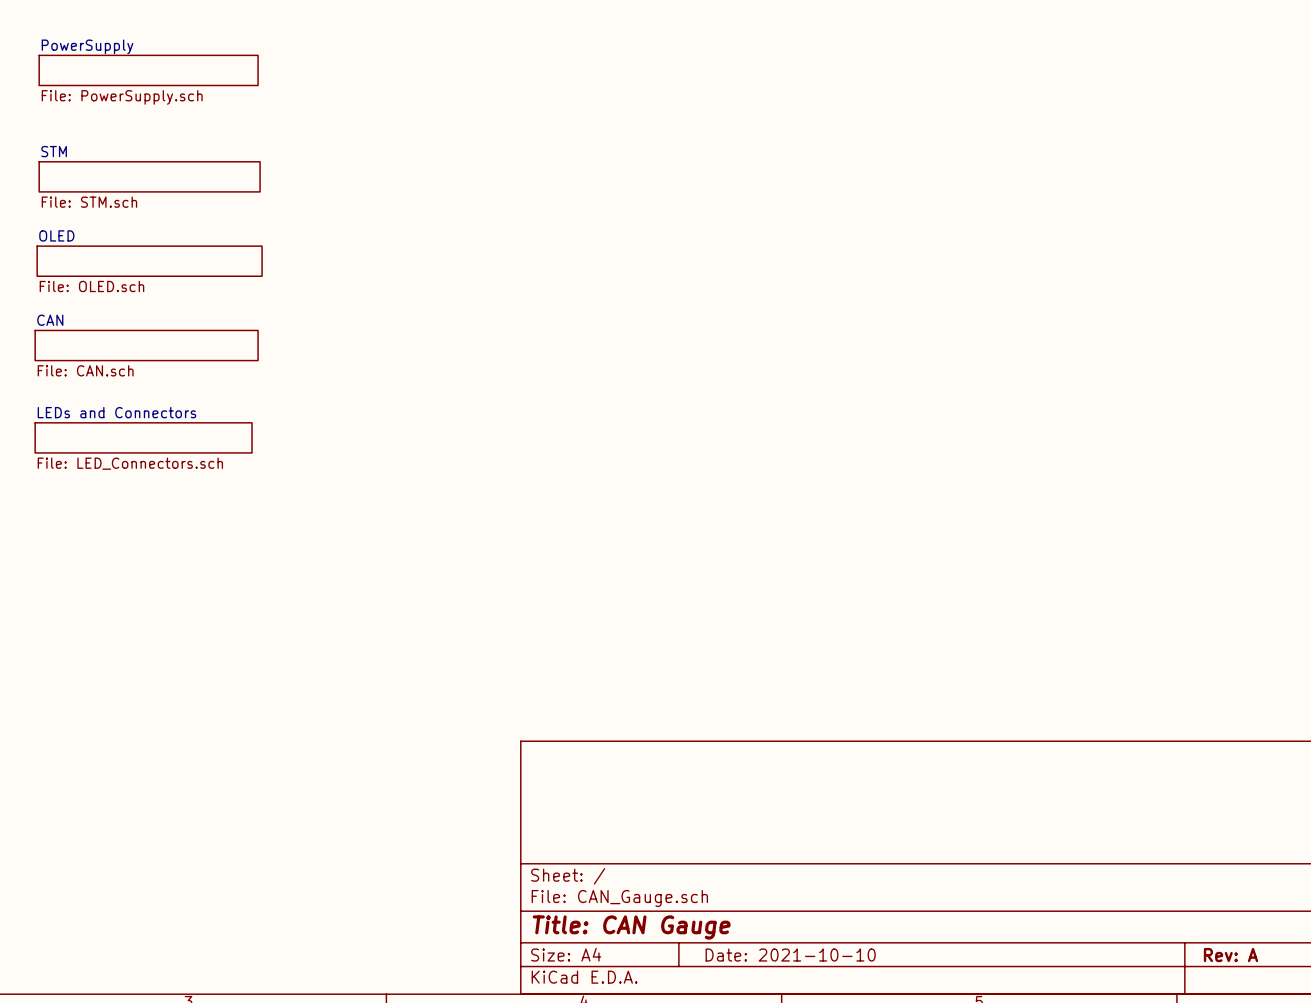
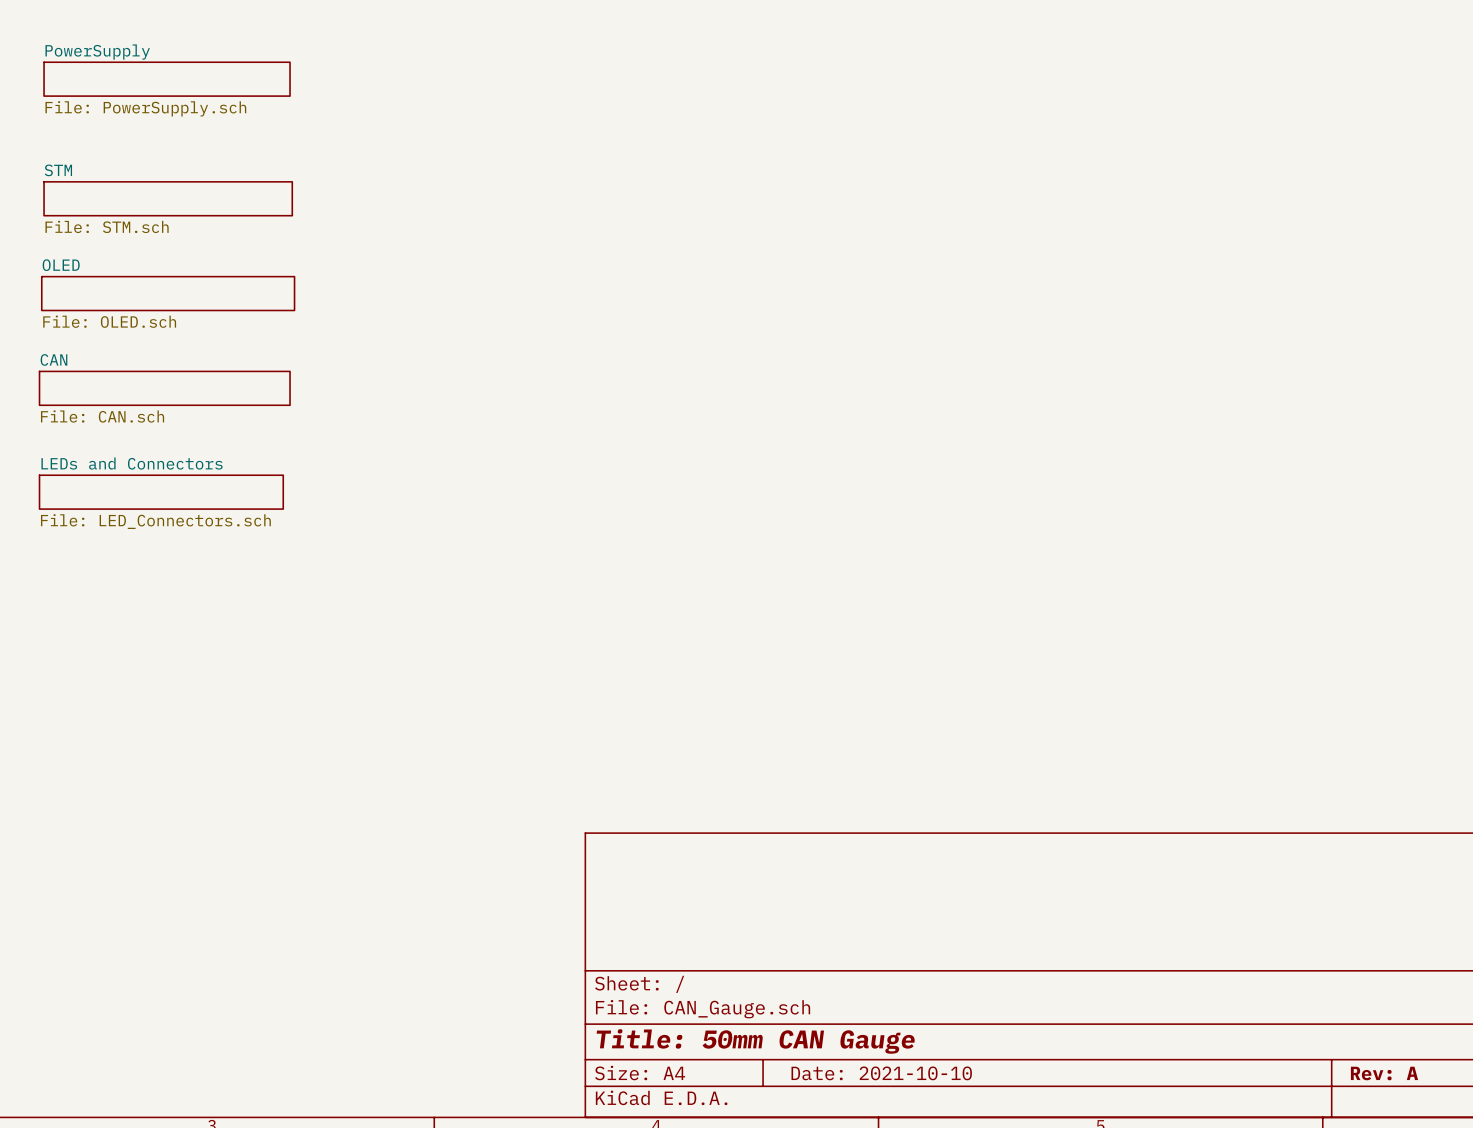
title block: Title: CAN Gauge (631, 927) -> Title: 50mm CAN Gauge (755, 1041)

